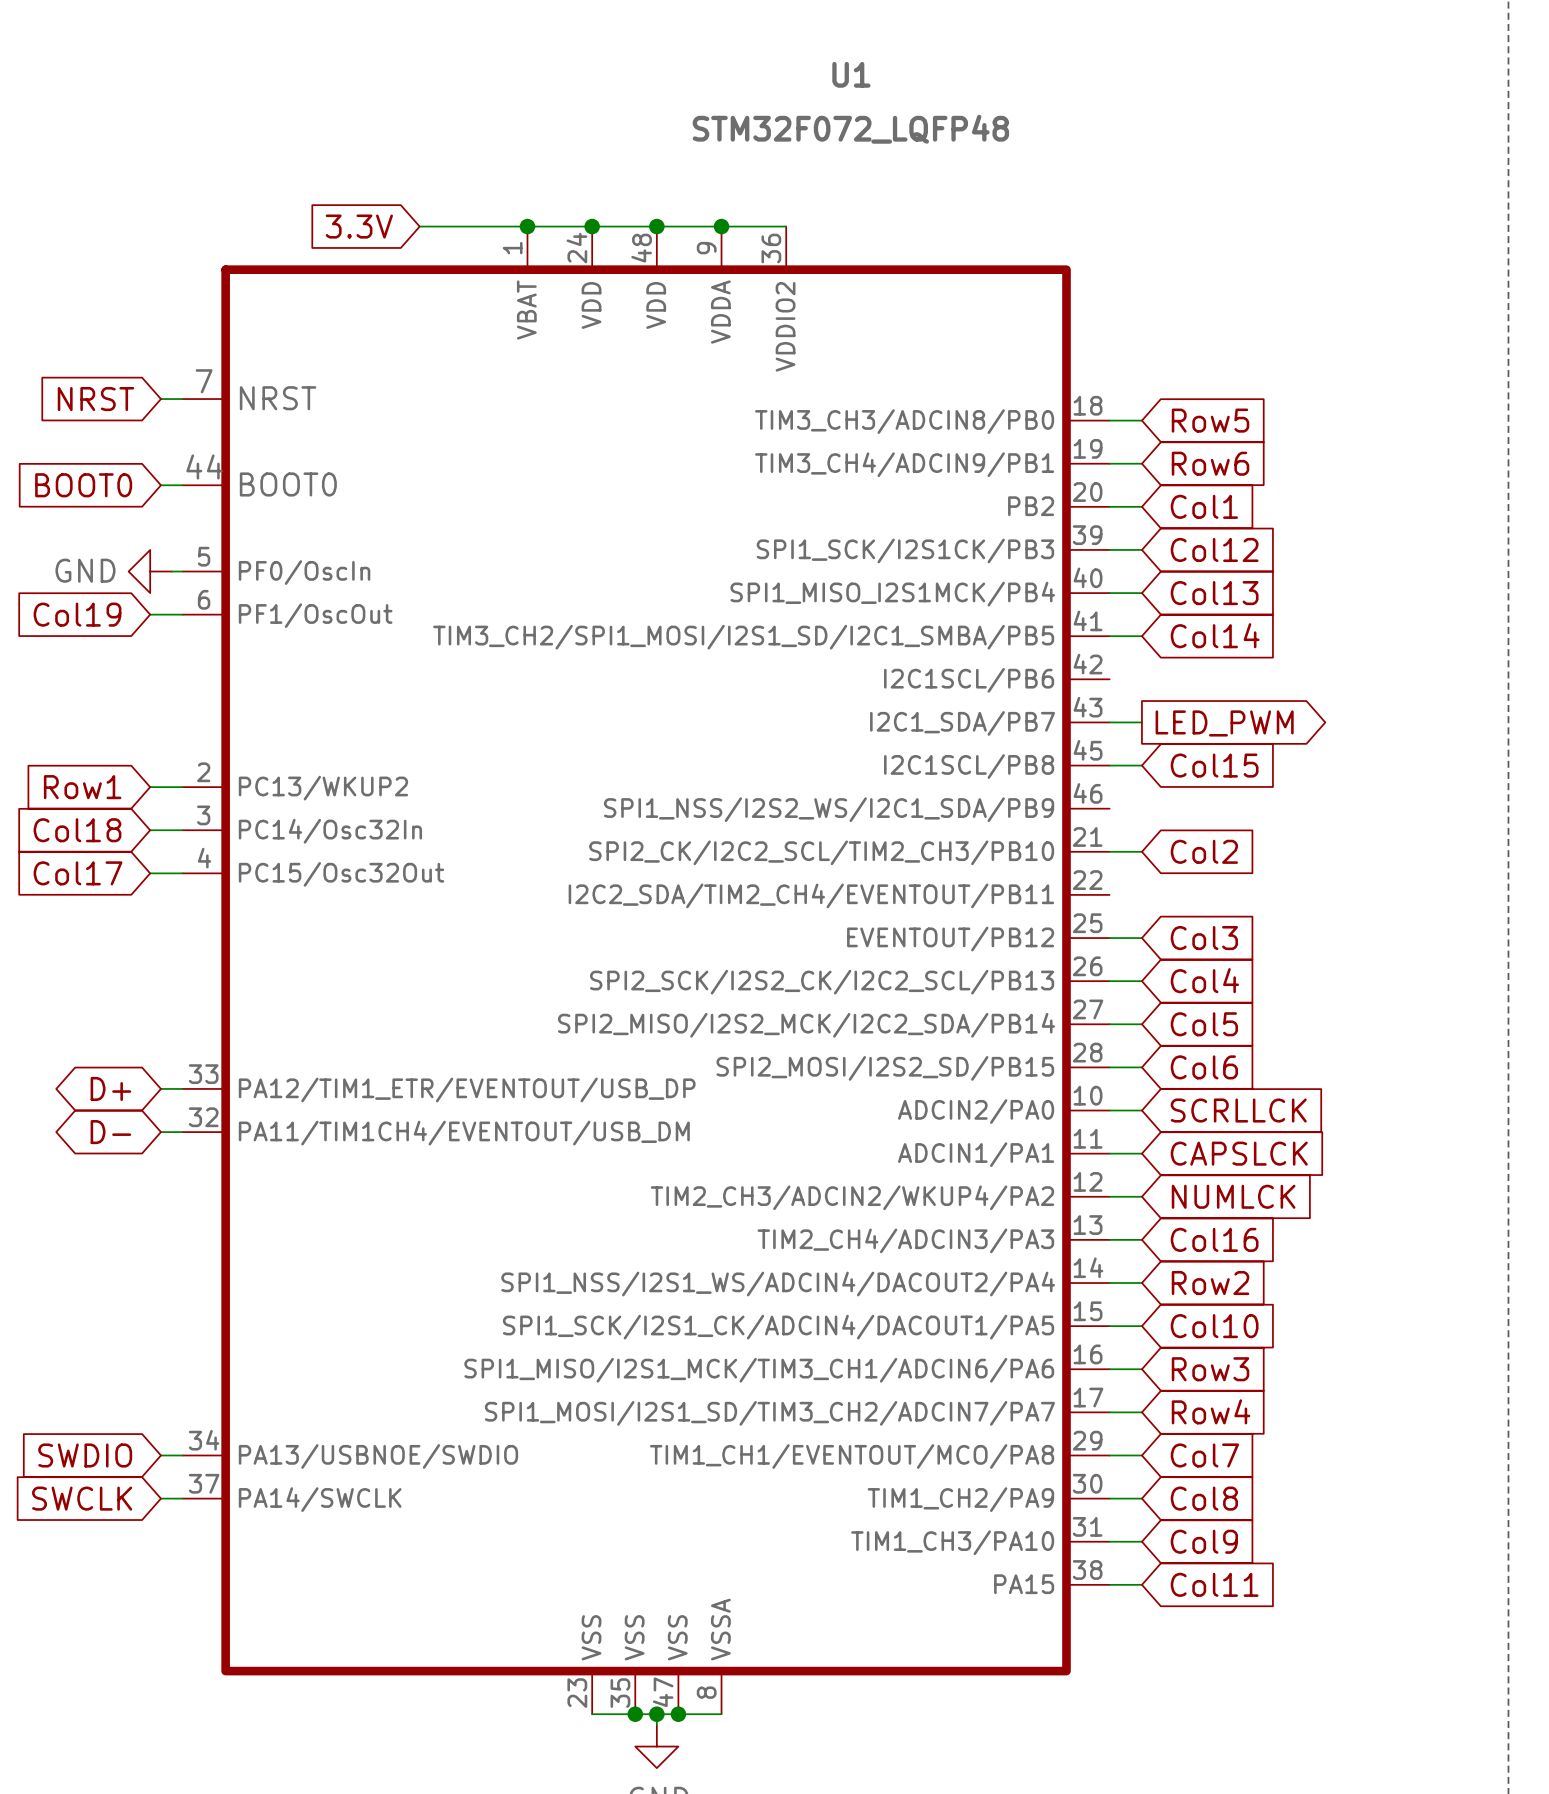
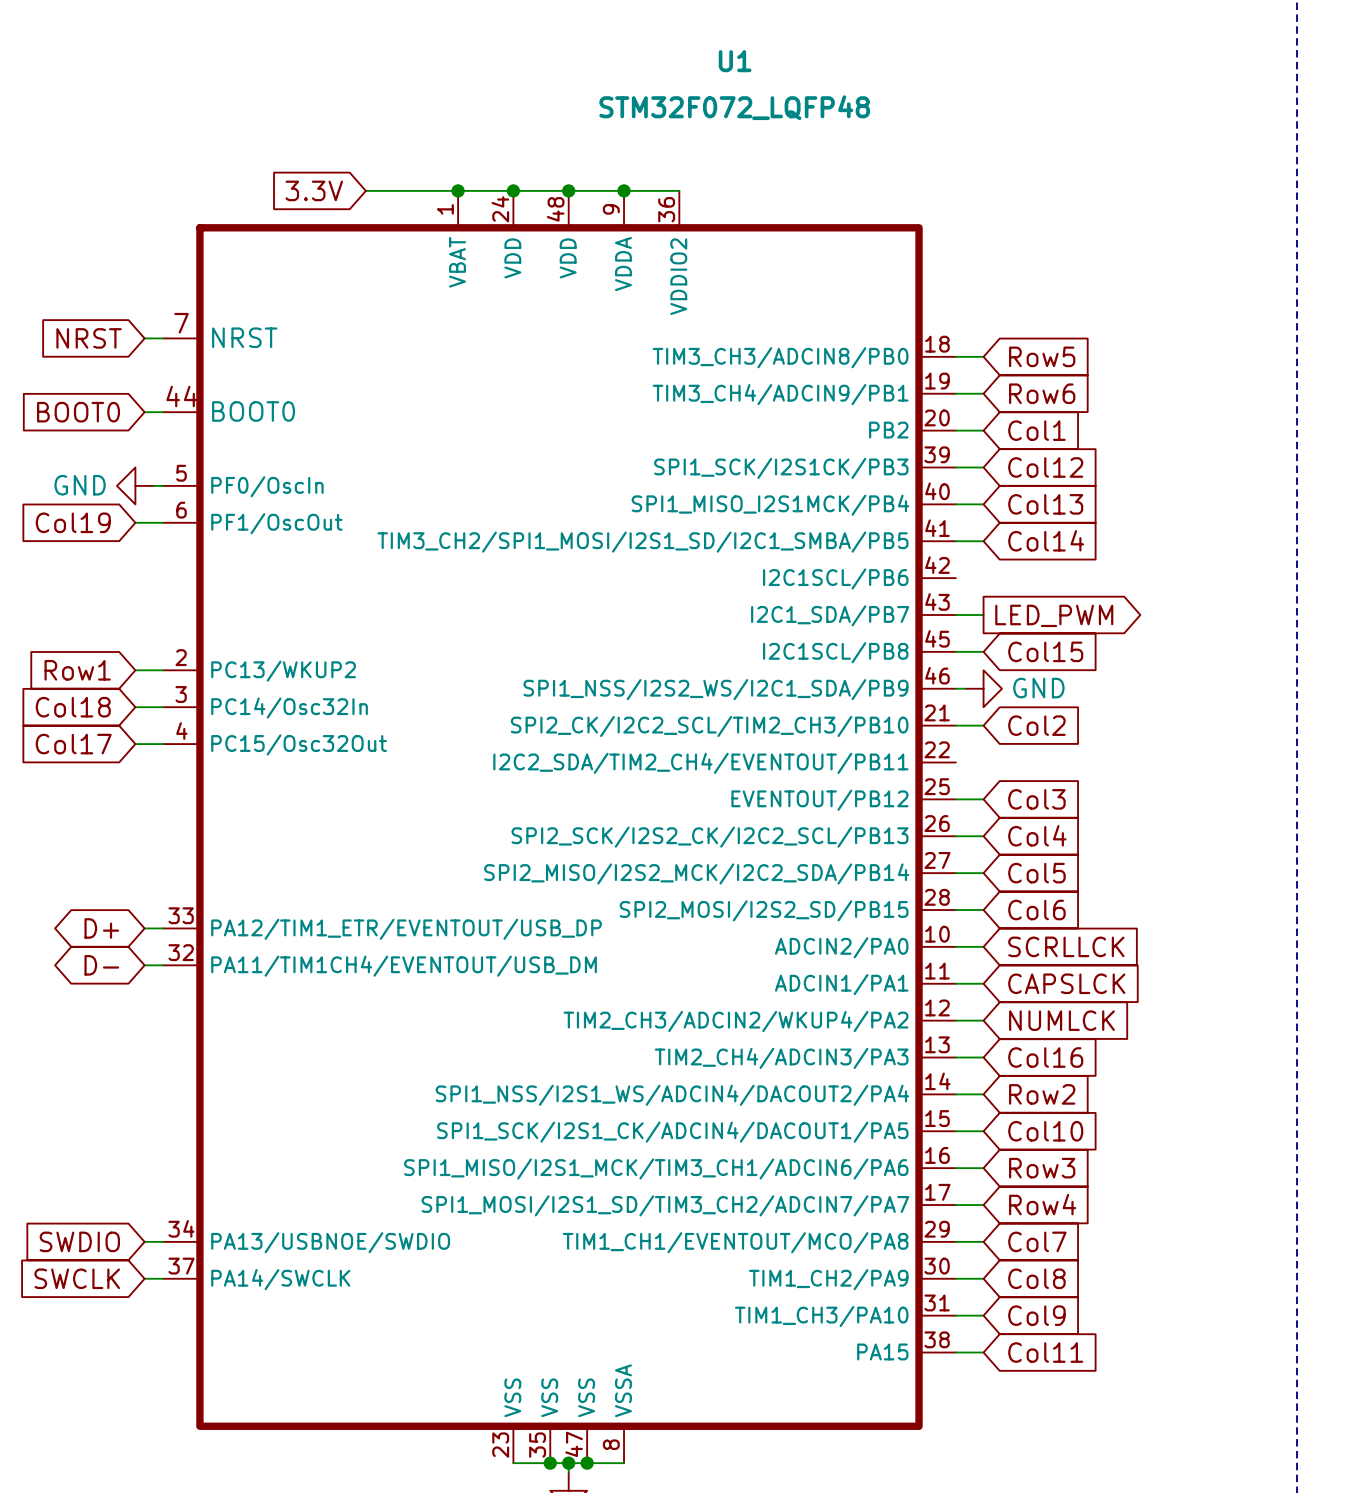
wire: none -> (955, 688) (965, 688)
power symbol: none -> GND (983, 688)

